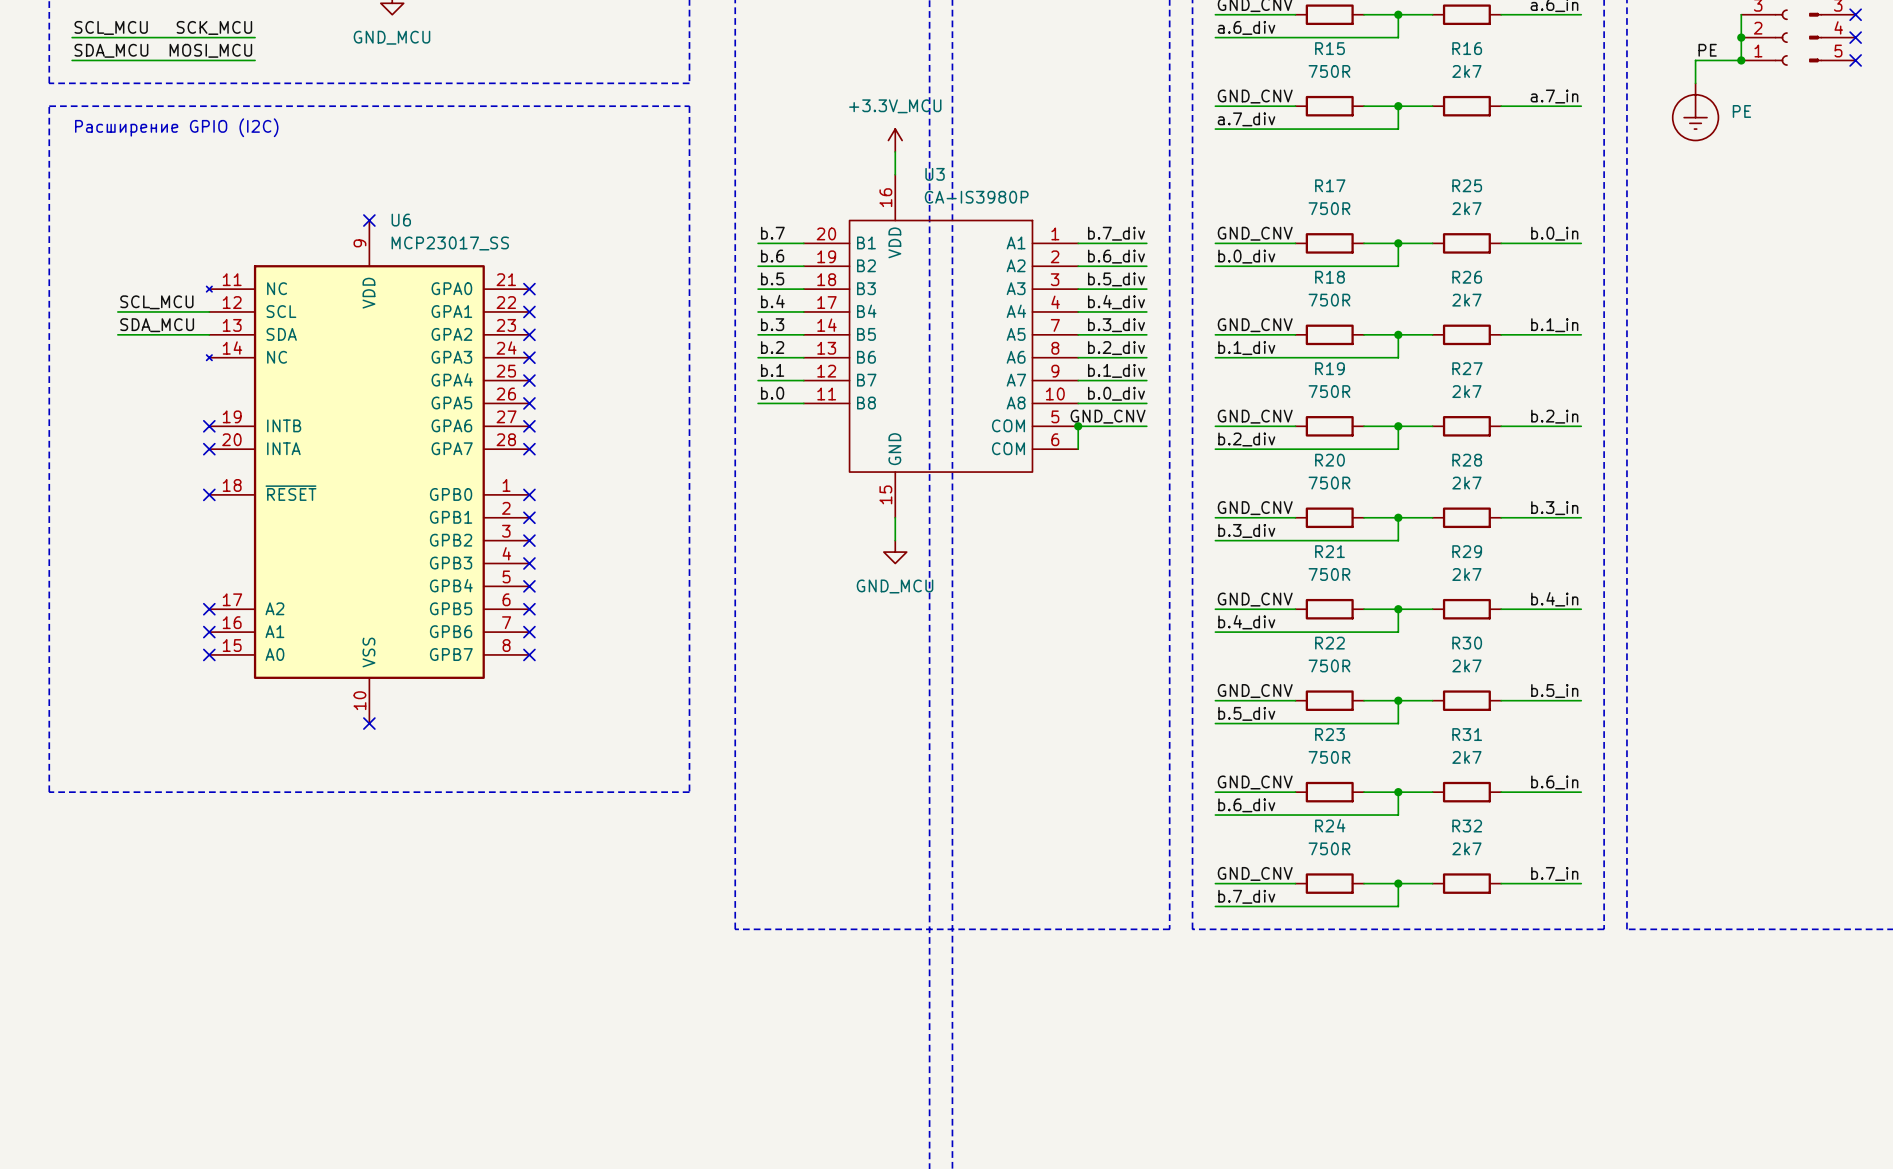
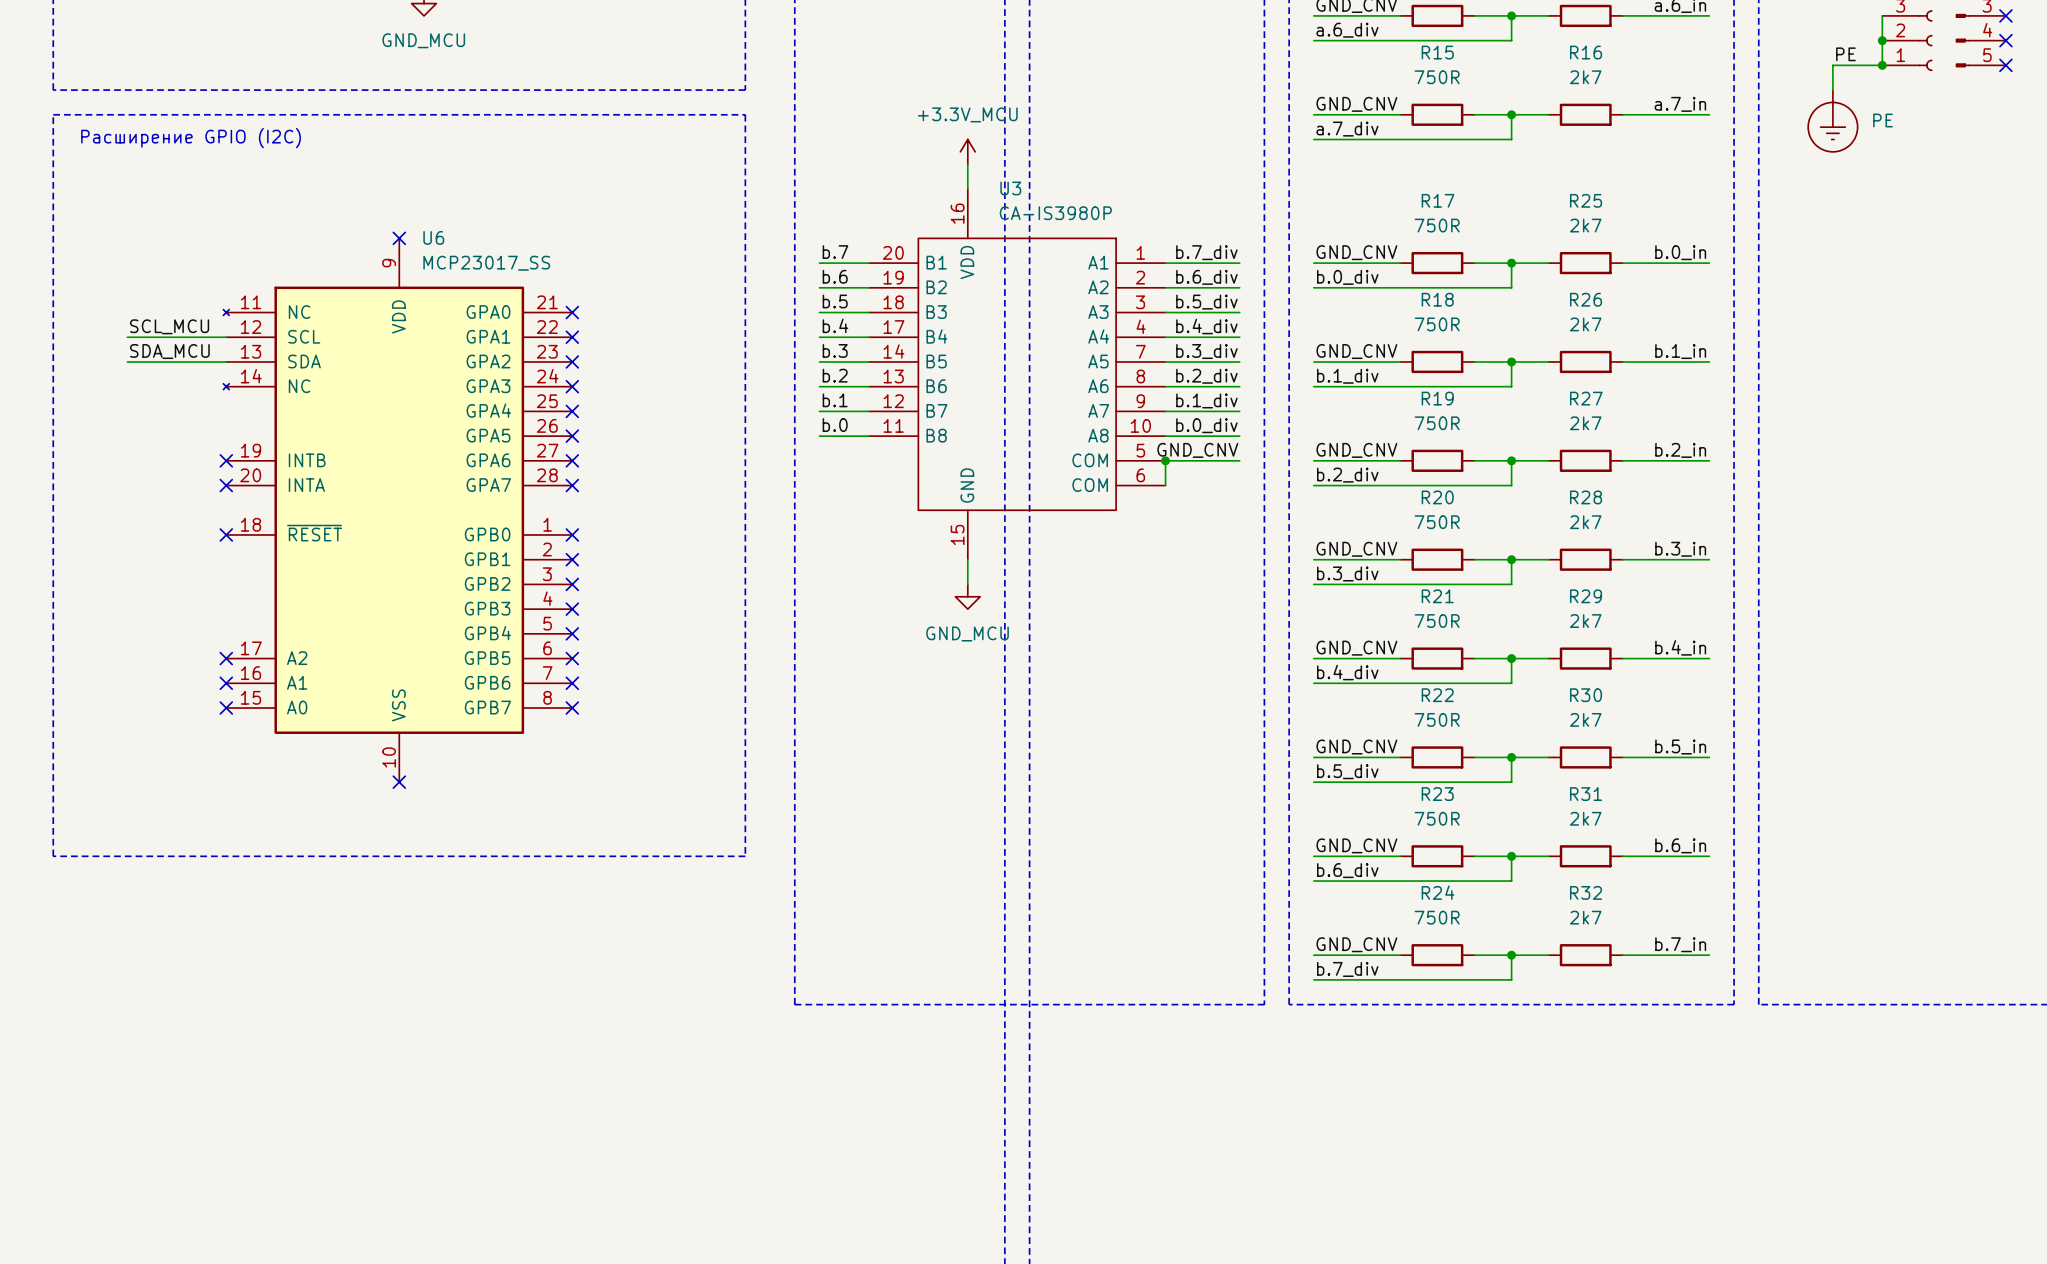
label: SCL_MCU (111, 27) -> none
label: SCK_MCU (214, 27) -> none
wire: (72, 37) (255, 37) -> none
label: SDA_MCU (111, 50) -> none
label: MOSI_MCU (210, 50) -> none
wire: (72, 60) (255, 60) -> none

